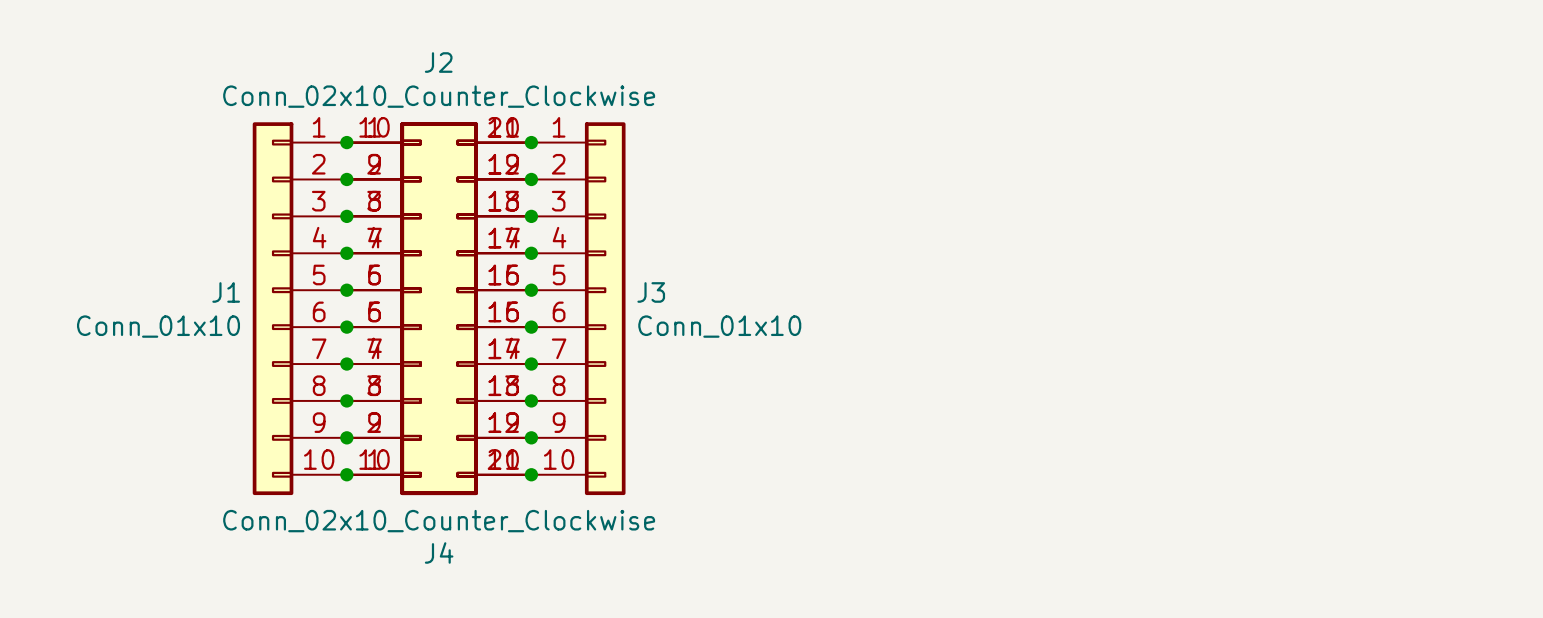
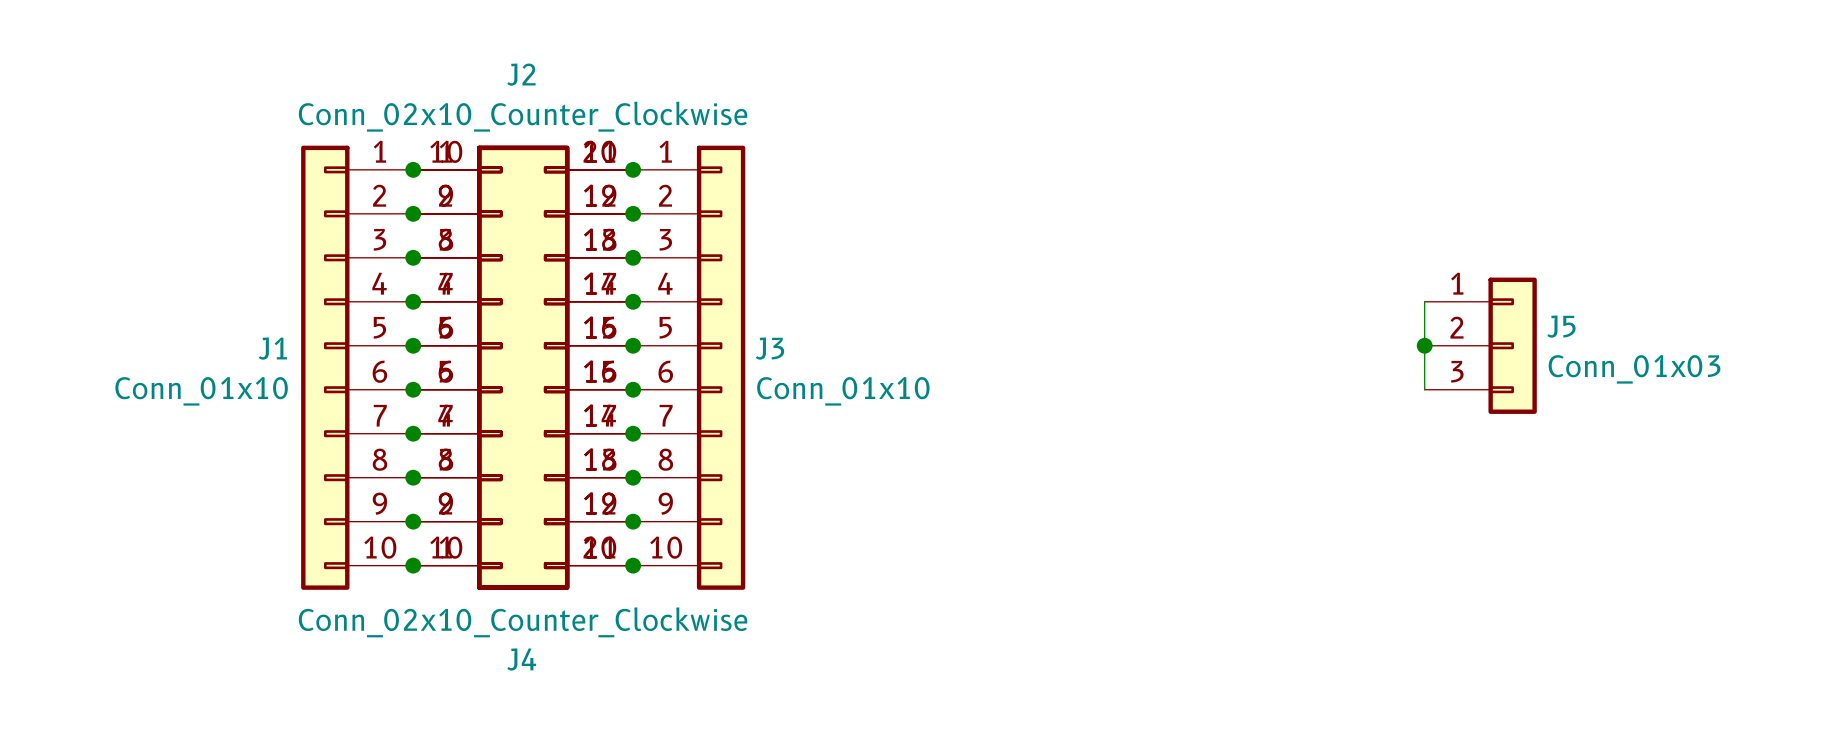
wire: none -> (1424, 301) (1424, 389)
junction: none -> (1424, 345)
J5: none -> Conn_01x03 (1480, 345)

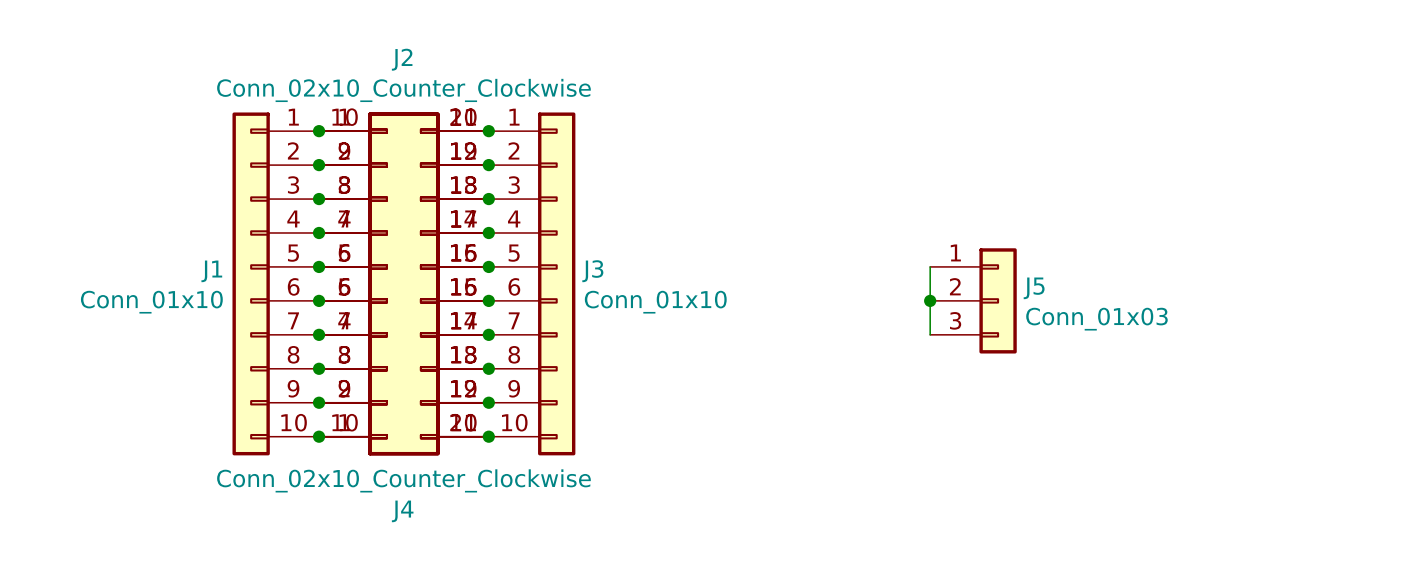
wire: (1424, 301) (1424, 389) -> (930, 266) (930, 334)
junction: (1424, 345) -> none
J5 position: (1480, 345) -> (973, 300)
junction: none -> (930, 300)

